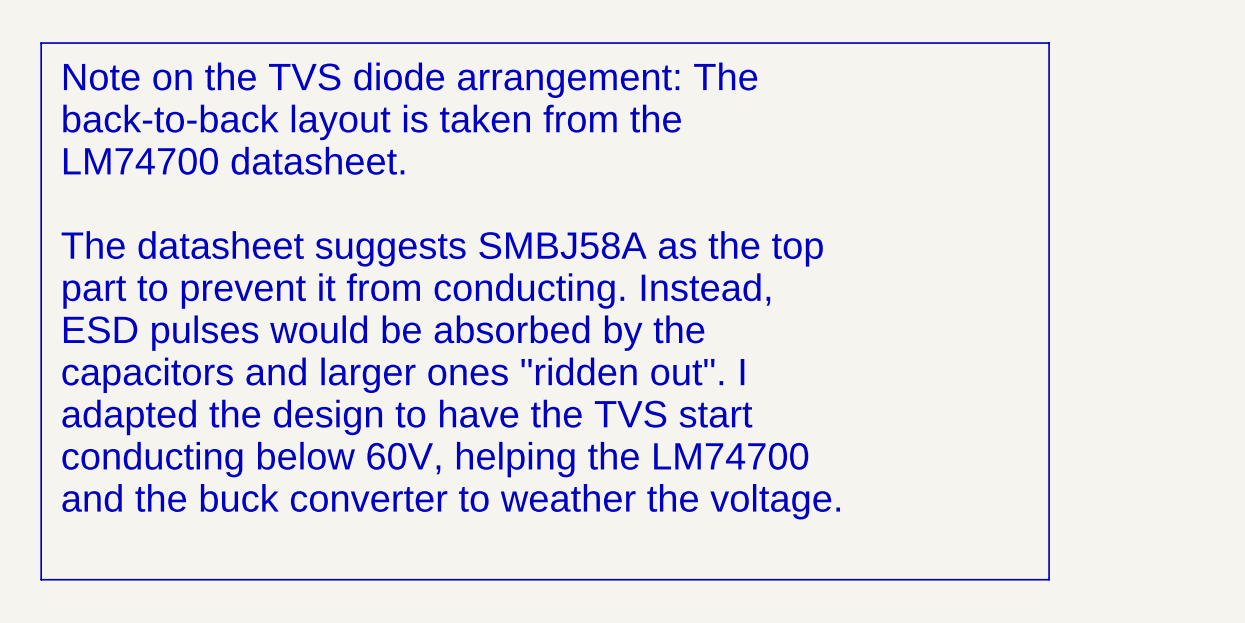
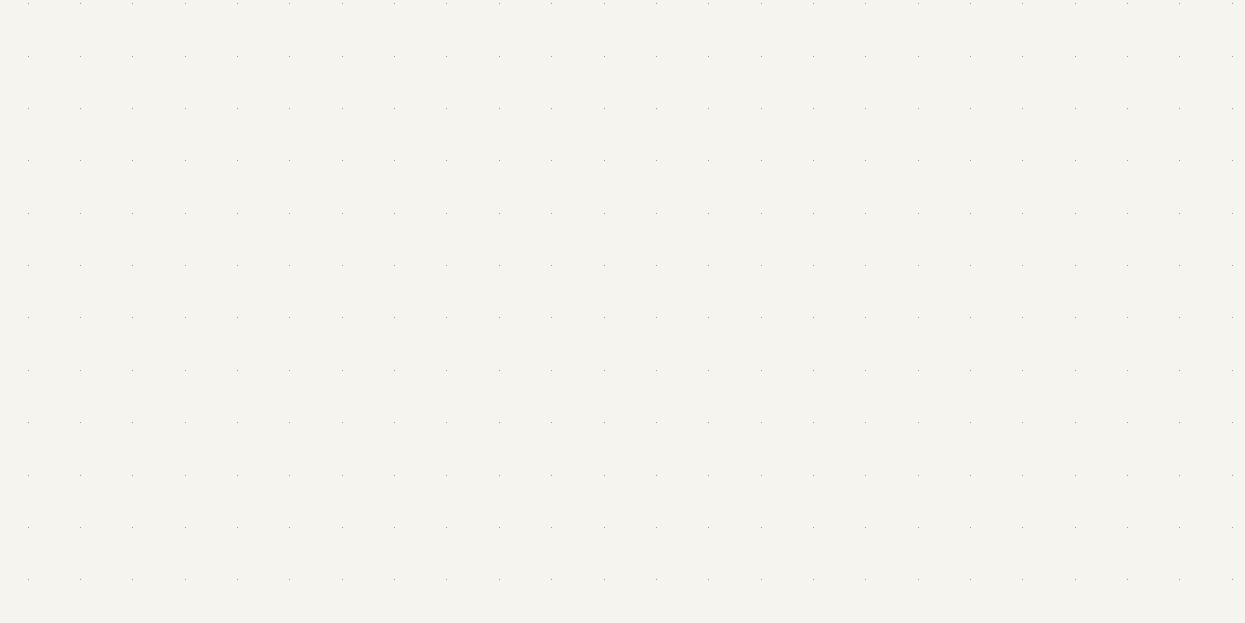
line: (41, 43) (1049, 43) (1049, 579) (41, 579) (41, 43) -> none
text: Note on the TVS diode arrangement: The (410, 80) -> none
text: back-to-back layout is taken from the (372, 122) -> none
text: LM74700 datasheet. (234, 160) -> none
text: The datasheet suggests SMBJ58A as the top (442, 248) -> none
text: part to prevent it from conducting. Instead, (416, 291) -> none
text: ESD pulses would be absorbed by the (384, 333) -> none
text: capacitors and larger ones "ridden out". I (403, 375) -> none
text: adapted the design to have the TVS start (407, 417) -> none
text: conducting below 60V, helping the LM74700 (435, 459) -> none
text: and the buck converter to weather the voltage. (451, 501) -> none

